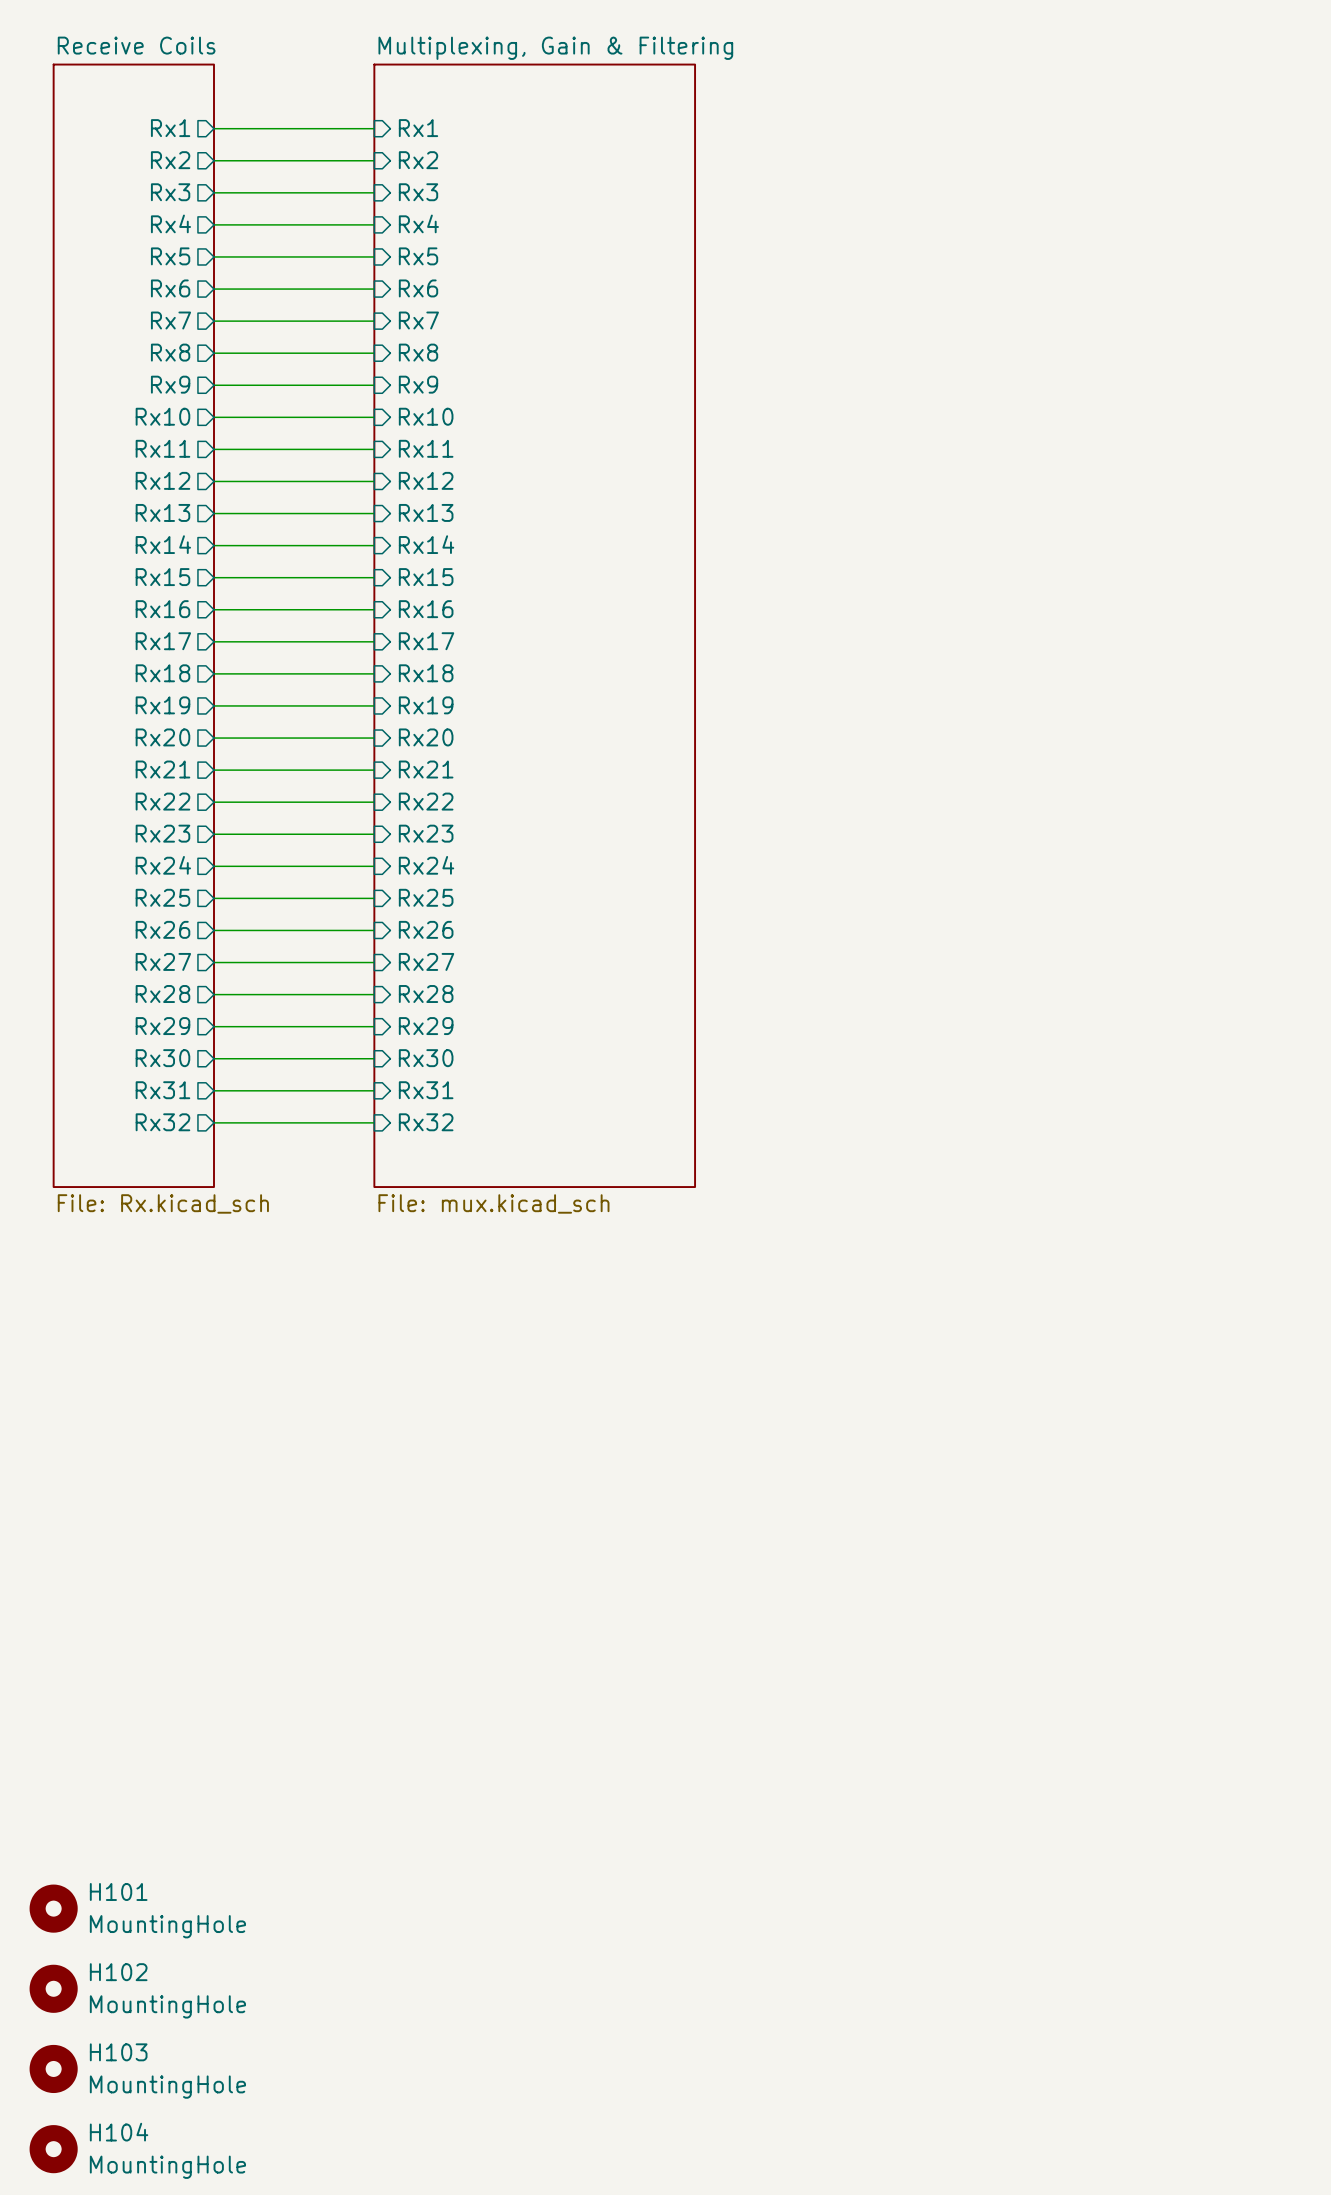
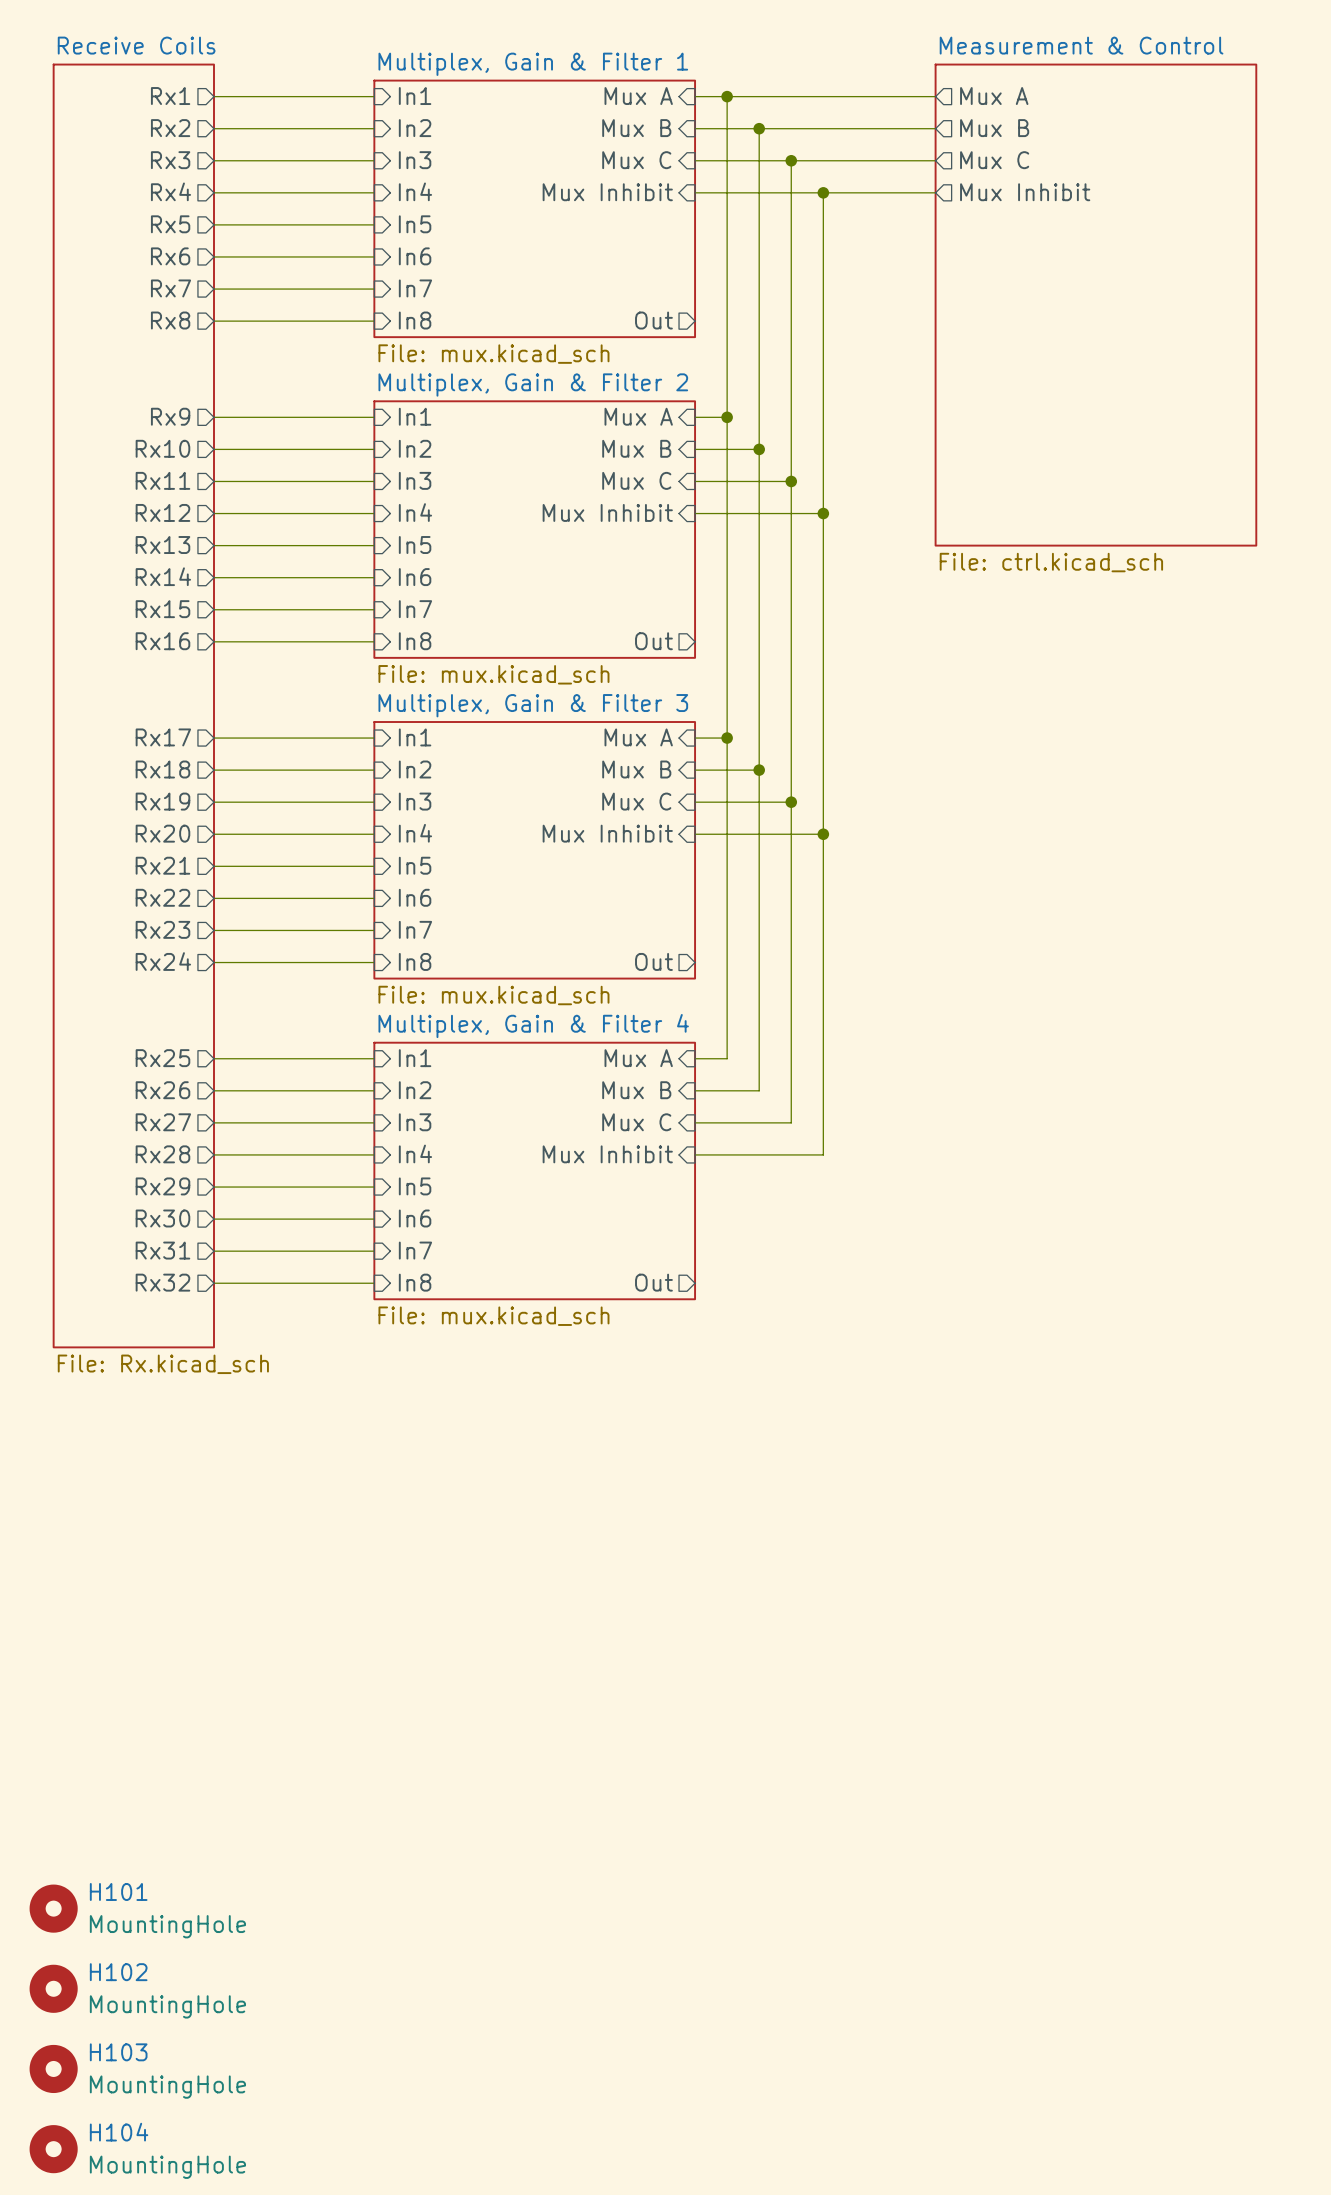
sheet pin: none -> Rx1 (170, 96)
sheet pin: none -> In1 (415, 96)
sheet pin: none -> Mux A (638, 96)
wire: none -> (695, 96) (935, 96)
wire: none -> (727, 96) (727, 1058) (695, 1058)
junction: none -> (727, 96)
sheet pin: none -> Mux A (994, 96)
sheet pin: Rx1 (170, 128) -> Rx2 (170, 128)
sheet pin: Rx1 (418, 128) -> In2 (415, 128)
sheet pin: none -> Mux B (636, 128)
wire: none -> (695, 128) (935, 128)
wire: none -> (759, 128) (759, 1090) (695, 1090)
junction: none -> (759, 128)
sheet pin: none -> Mux B (994, 128)
sheet pin: Rx2 (170, 160) -> Rx3 (170, 160)
sheet pin: Rx2 (418, 160) -> In3 (415, 160)
sheet pin: none -> Mux C (636, 160)
wire: none -> (695, 160) (935, 160)
wire: none -> (791, 160) (791, 1122) (695, 1122)
junction: none -> (791, 160)
sheet pin: none -> Mux C (994, 160)
sheet pin: Rx3 (170, 192) -> Rx4 (170, 191)
sheet pin: Rx3 (418, 192) -> In4 (415, 191)
sheet pin: none -> Mux Inhibit (607, 192)
wire: none -> (695, 192) (935, 192)
wire: none -> (823, 192) (823, 1154) (695, 1154)
junction: none -> (823, 192)
sheet pin: none -> Mux Inhibit (1025, 192)
sheet Multiplex, Gain & Filter 1: none -> File: mux.kicad_sch (534, 208)
sheet pin: Rx4 (170, 223) -> Rx5 (170, 224)
sheet pin: Rx4 (418, 223) -> In5 (415, 224)
sheet pin: Rx5 (170, 256) -> Rx6 (170, 256)
sheet pin: Rx5 (418, 256) -> In6 (415, 256)
sheet pin: Rx6 (170, 288) -> Rx7 (170, 288)
sheet pin: Rx6 (418, 288) -> In7 (415, 288)
sheet Measurement & Control: none -> File: ctrl.kicad_sch (1095, 305)
sheet pin: Rx7 (170, 320) -> Rx8 (170, 320)
sheet pin: Rx7 (418, 320) -> In8 (415, 320)
sheet pin: none -> Out (653, 320)
sheet pin: Rx8 (170, 352) -> none
sheet pin: Rx8 (418, 352) -> none
wire: (214, 353) (374, 353) -> (214, 96) (374, 96)
sheet pin: Rx9 (170, 384) -> none
sheet pin: Rx9 (418, 384) -> none
wire: (214, 385) (374, 385) -> none
sheet pin: Rx10 (162, 416) -> Rx9 (170, 416)
sheet pin: Rx10 (426, 416) -> In1 (415, 416)
sheet pin: none -> Mux A (638, 416)
wire: none -> (695, 417) (727, 417)
junction: none -> (727, 417)
sheet pin: Rx11 (162, 448) -> Rx10 (162, 448)
sheet pin: Rx11 (426, 448) -> In2 (415, 448)
sheet pin: none -> Mux B (636, 448)
wire: none -> (695, 449) (759, 449)
junction: none -> (759, 449)
sheet pin: Rx12 (162, 480) -> Rx11 (162, 480)
sheet pin: Rx12 (426, 480) -> In3 (415, 480)
sheet pin: none -> Mux C (636, 480)
wire: none -> (695, 481) (791, 481)
junction: none -> (791, 481)
sheet pin: Rx13 (162, 512) -> Rx12 (162, 512)
sheet pin: Rx13 (426, 512) -> In4 (415, 512)
sheet pin: none -> Mux Inhibit (607, 512)
wire: none -> (695, 513) (823, 513)
junction: none -> (823, 513)
sheet Multiplex, Gain & Filter 2: none -> File: mux.kicad_sch (534, 529)
sheet pin: Rx14 (163, 544) -> Rx13 (162, 545)
sheet pin: Rx14 (426, 544) -> In5 (415, 545)
sheet pin: Rx15 (162, 577) -> Rx14 (163, 576)
sheet pin: Rx15 (426, 577) -> In6 (415, 577)
sheet pin: Rx16 (162, 609) -> Rx15 (162, 609)
sheet pin: Rx16 (426, 609) -> In7 (415, 609)
sheet Receive Coils: File: Rx.kicad_sch (133, 625) -> none
sheet Multiplexing, Gain & Filtering: File: mux.kicad_sch (534, 625) -> none
sheet pin: Rx17 (163, 641) -> Rx16 (162, 641)
sheet pin: Rx17 (426, 641) -> In8 (415, 641)
sheet pin: none -> Out (653, 641)
sheet pin: Rx18 (162, 673) -> none
wire: (214, 673) (374, 673) -> none
sheet pin: Rx18 (426, 673) -> none
sheet Receive Coils: none -> File: Rx.kicad_sch (133, 705)
sheet pin: Rx19 (162, 705) -> none
wire: (214, 705) (374, 705) -> none
sheet pin: Rx19 (426, 705) -> none
sheet pin: Rx20 (162, 737) -> Rx17 (163, 737)
sheet pin: Rx20 (426, 737) -> In1 (415, 737)
sheet pin: none -> Mux A (638, 737)
wire: none -> (695, 738) (727, 738)
junction: none -> (727, 738)
sheet pin: Rx21 (162, 769) -> Rx18 (162, 769)
sheet pin: Rx21 (426, 769) -> In2 (415, 769)
sheet pin: none -> Mux B (636, 769)
wire: none -> (695, 770) (759, 770)
junction: none -> (759, 770)
sheet pin: Rx22 (162, 801) -> Rx19 (162, 801)
sheet pin: Rx22 (426, 801) -> In3 (415, 801)
sheet pin: none -> Mux C (636, 801)
wire: none -> (695, 802) (791, 802)
junction: none -> (791, 802)
sheet pin: Rx23 (162, 833) -> Rx20 (162, 833)
sheet pin: Rx23 (426, 833) -> In4 (415, 833)
sheet pin: none -> Mux Inhibit (607, 833)
wire: none -> (695, 834) (823, 834)
junction: none -> (823, 834)
sheet Multiplex, Gain & Filter 3: none -> File: mux.kicad_sch (534, 850)
sheet pin: Rx24 (163, 865) -> Rx21 (162, 865)
sheet pin: Rx24 (426, 865) -> In5 (415, 865)
sheet pin: Rx25 (162, 897) -> Rx22 (162, 897)
sheet pin: Rx25 (426, 897) -> In6 (415, 897)
sheet pin: Rx26 (162, 929) -> Rx23 (162, 929)
sheet pin: Rx26 (426, 929) -> In7 (415, 929)
sheet pin: Rx27 (163, 961) -> Rx24 (163, 961)
sheet pin: Rx27 (426, 961) -> In8 (415, 961)
sheet pin: none -> Out (653, 961)
sheet pin: Rx28 (162, 994) -> none
wire: (214, 994) (374, 994) -> (214, 1154) (374, 1154)
sheet pin: Rx28 (426, 994) -> none
sheet pin: Rx29 (162, 1026) -> none
wire: (214, 1026) (374, 1026) -> (214, 1187) (374, 1187)
sheet pin: Rx29 (426, 1026) -> none
sheet pin: Rx30 (162, 1058) -> Rx25 (162, 1058)
sheet pin: Rx30 (426, 1058) -> In1 (415, 1058)
sheet pin: none -> Mux A (638, 1058)
sheet pin: Rx31 (162, 1090) -> Rx26 (162, 1090)
sheet pin: Rx31 (426, 1090) -> In2 (415, 1090)
sheet pin: none -> Mux B (636, 1090)
sheet pin: Rx32 (162, 1122) -> Rx27 (163, 1122)
sheet pin: Rx32 (426, 1122) -> In3 (415, 1122)
sheet pin: none -> Mux C (636, 1122)
sheet pin: none -> In4 (415, 1153)
sheet pin: none -> Rx28 (162, 1154)
sheet pin: none -> Mux Inhibit (607, 1154)
sheet Multiplex, Gain & Filter 4: none -> File: mux.kicad_sch (534, 1170)
sheet pin: none -> Rx29 (162, 1186)
sheet pin: none -> In5 (415, 1186)
sheet pin: none -> Rx30 (162, 1218)
sheet pin: none -> In6 (415, 1218)
wire: none -> (214, 1219) (374, 1219)
sheet pin: none -> Rx31 (162, 1250)
sheet pin: none -> In7 (415, 1250)
wire: none -> (214, 1251) (374, 1251)
sheet pin: none -> Rx32 (162, 1282)
sheet pin: none -> In8 (415, 1282)
sheet pin: none -> Out (653, 1282)
wire: none -> (214, 1283) (374, 1283)

